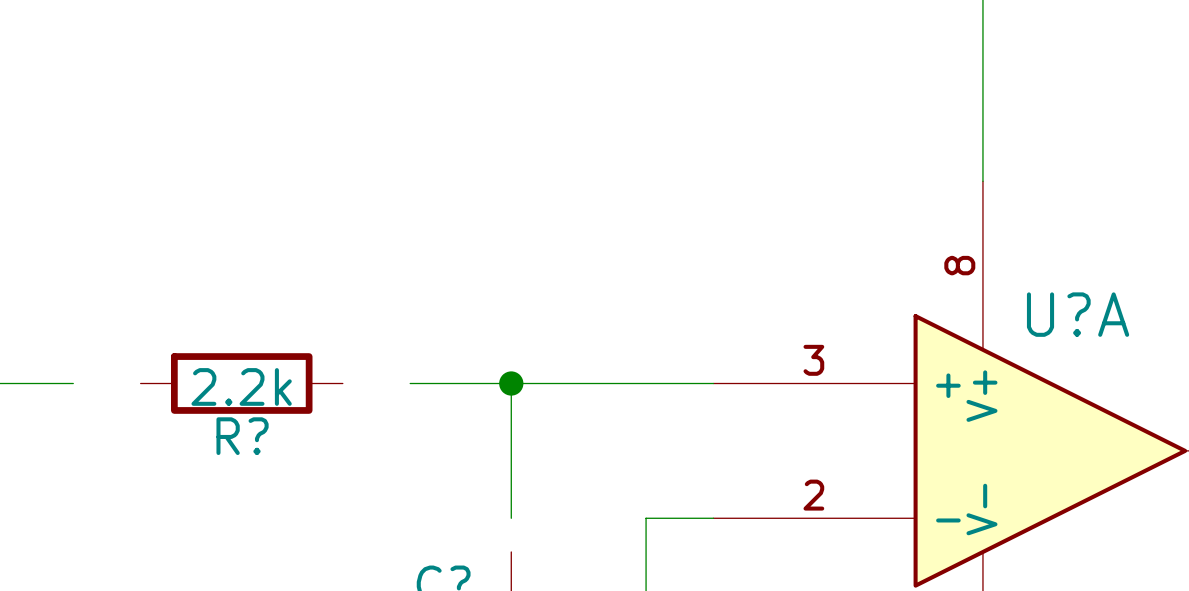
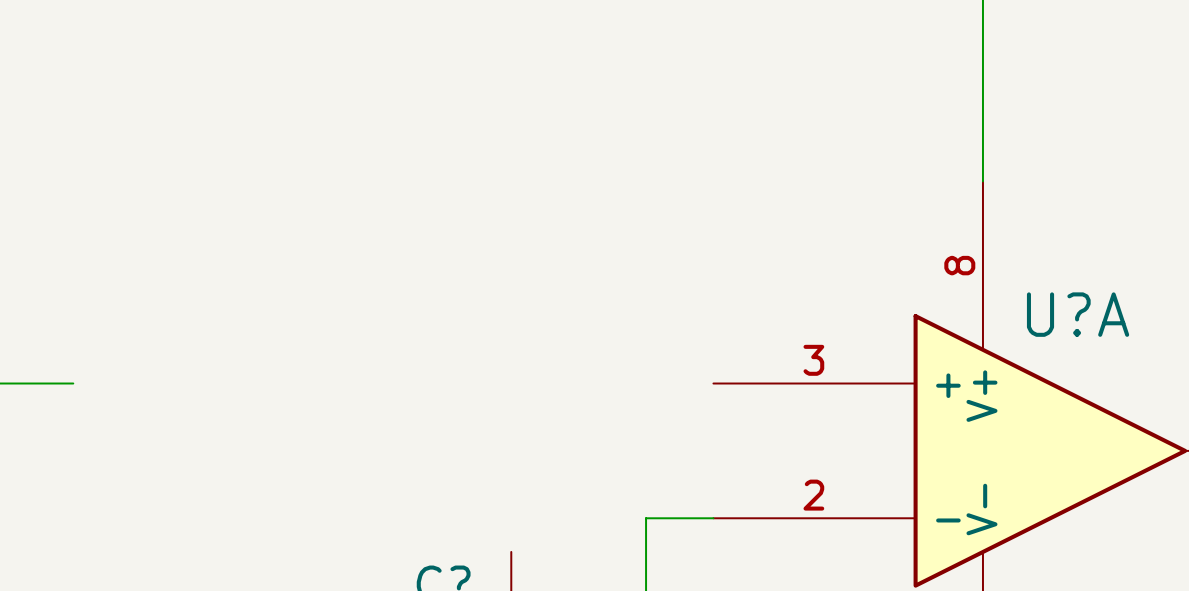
R?: 2.2k (241, 383) -> none
wire: (410, 383) (713, 383) -> none
wire: (511, 383) (511, 518) -> none
junction: (511, 383) -> none

